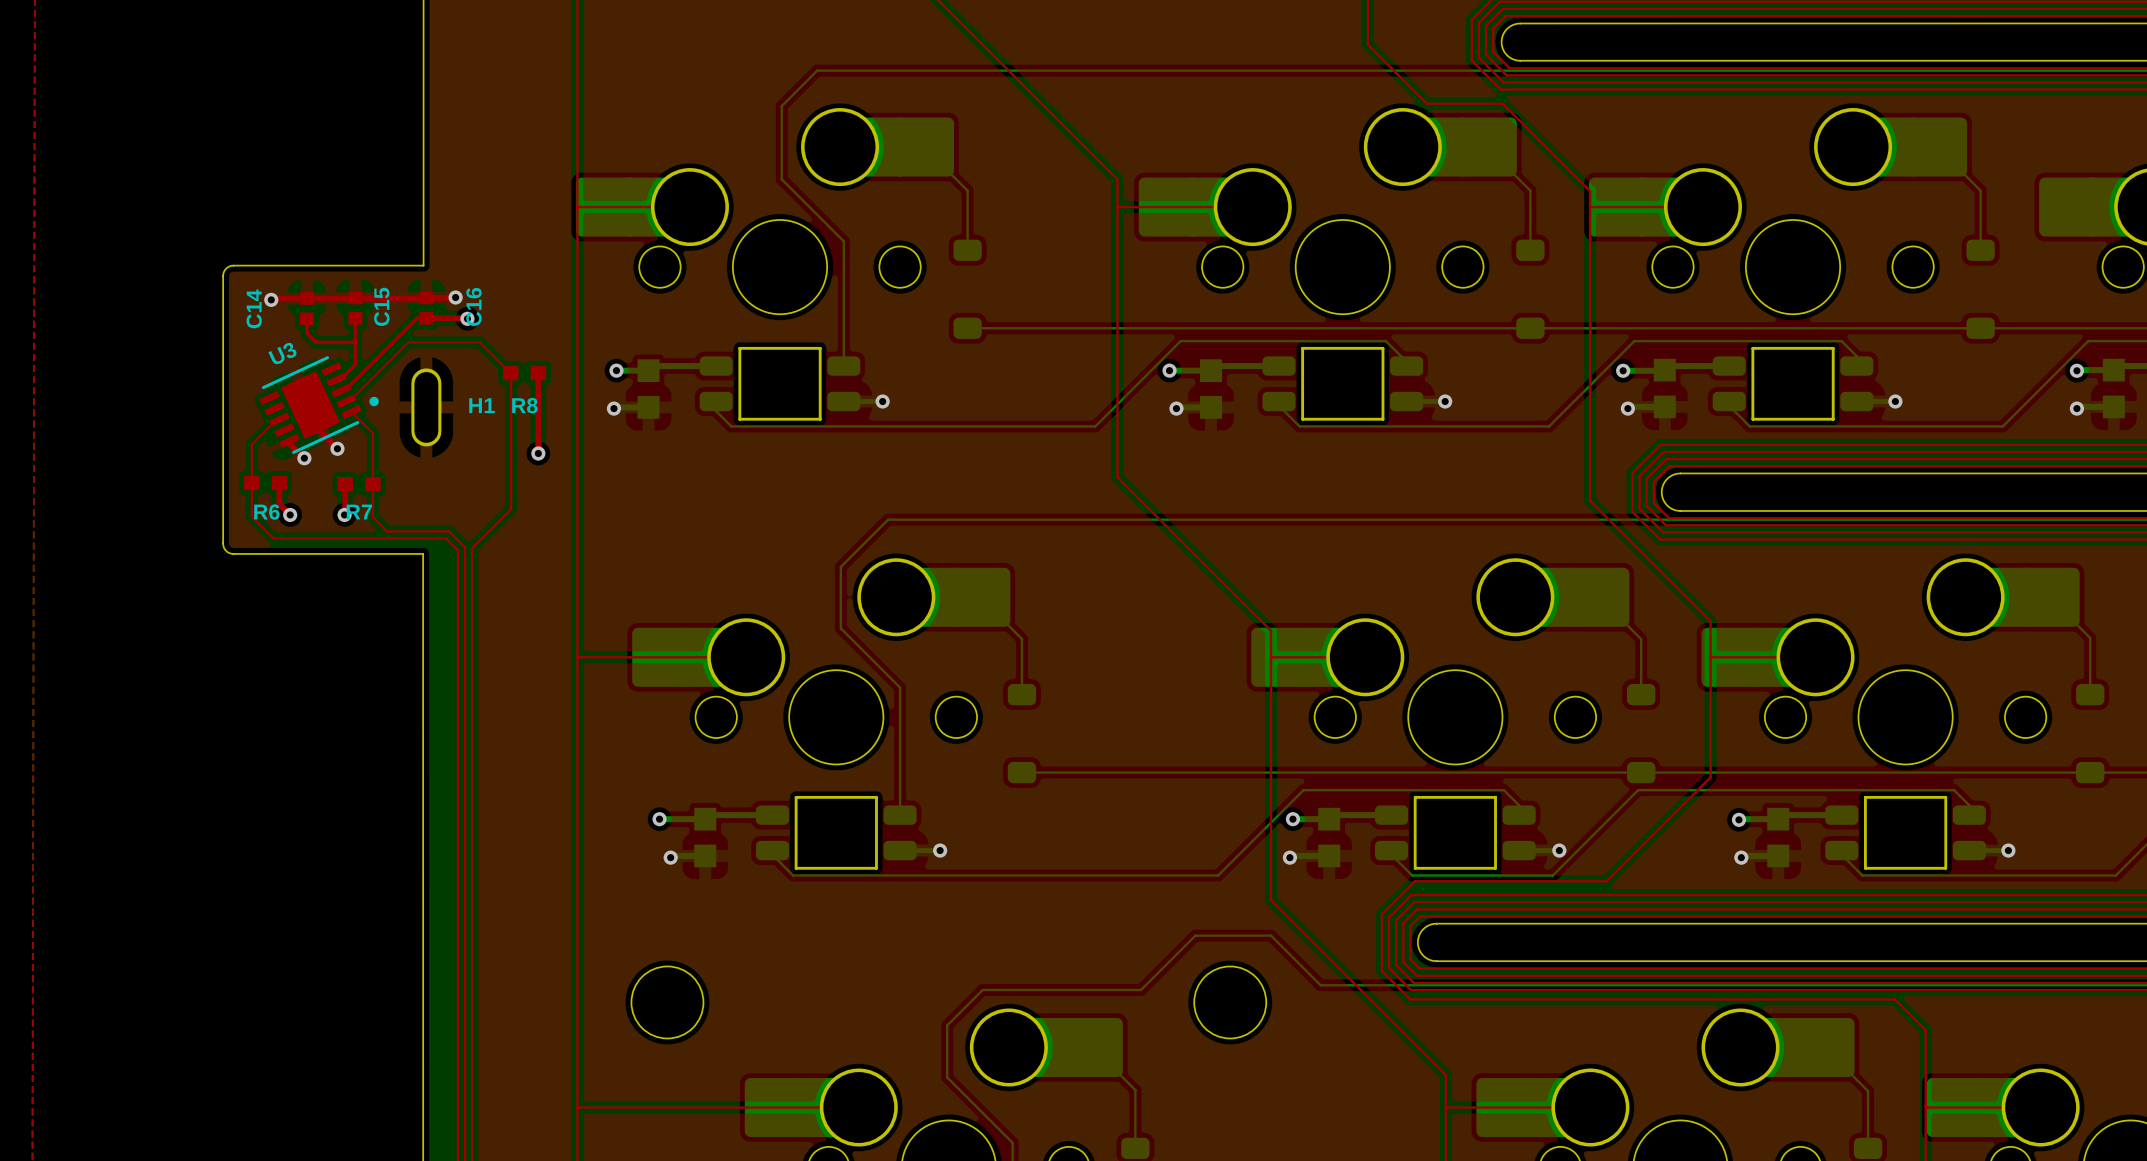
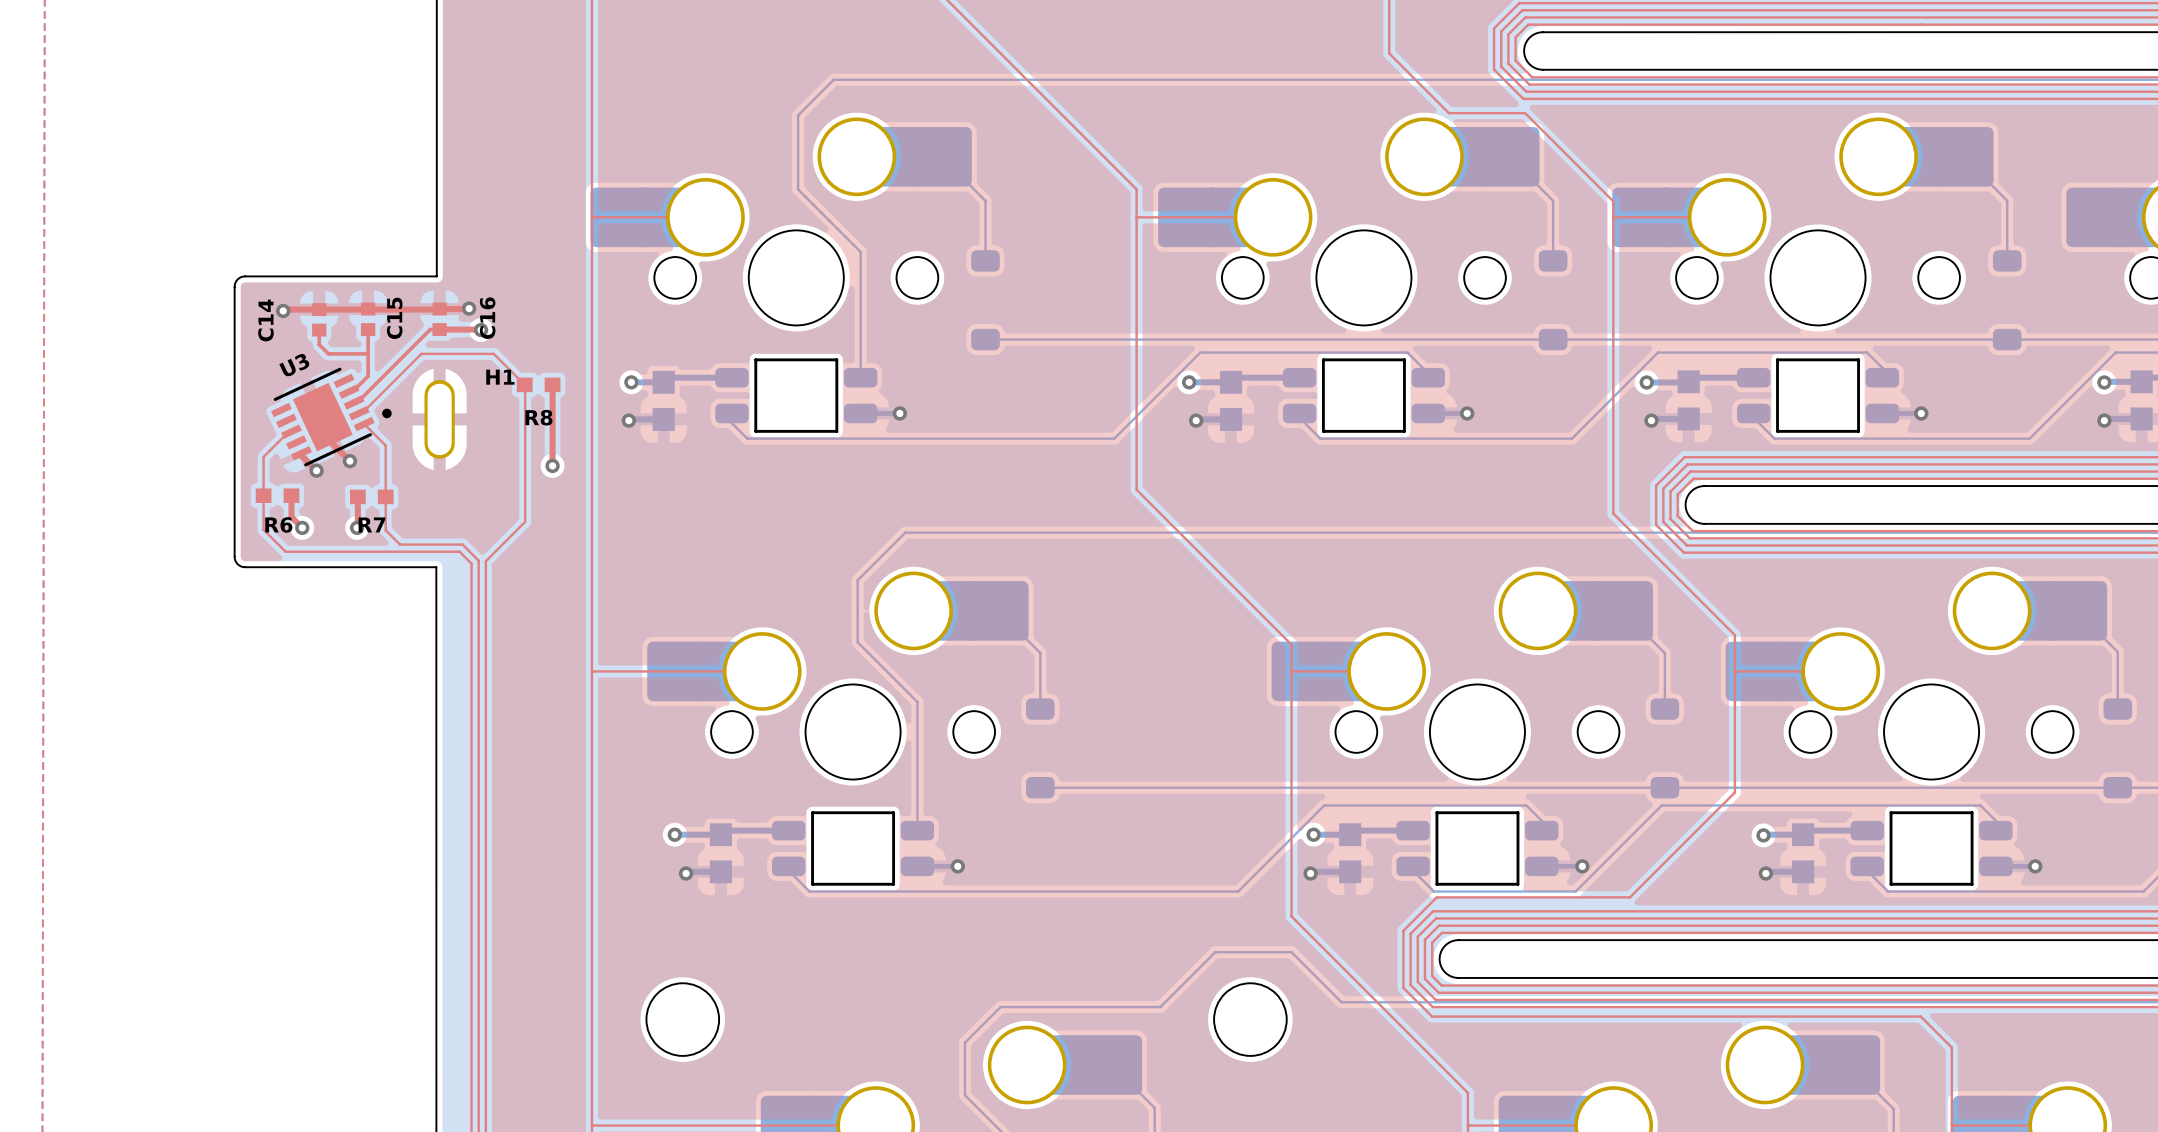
H1 name position: H1 (482, 405) -> H1 (500, 377)

